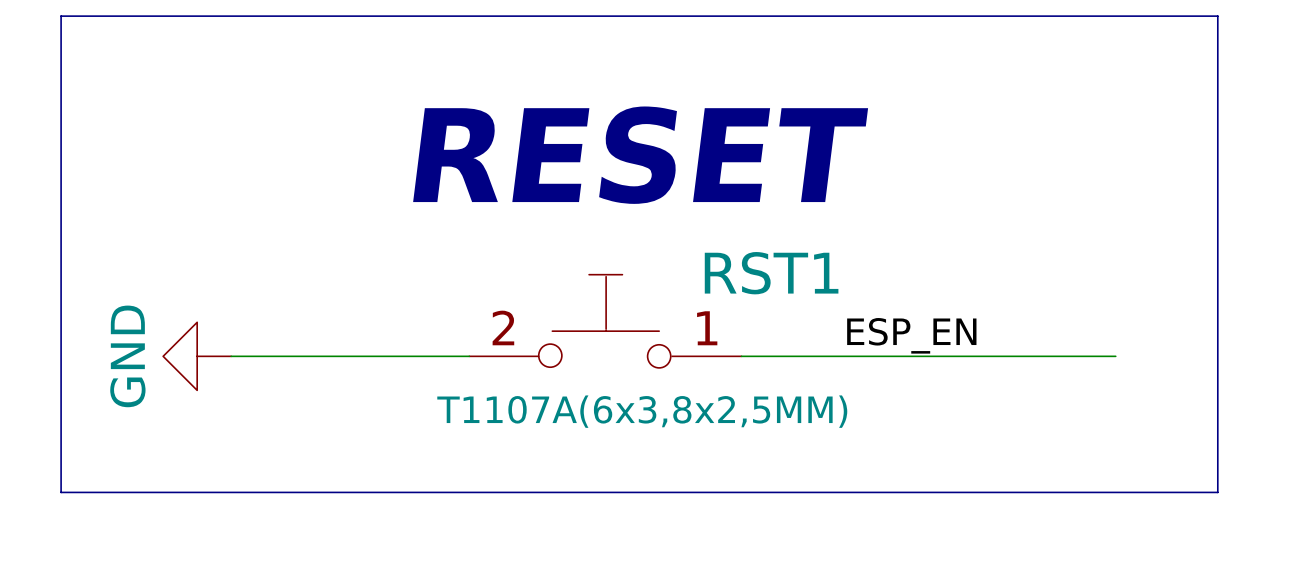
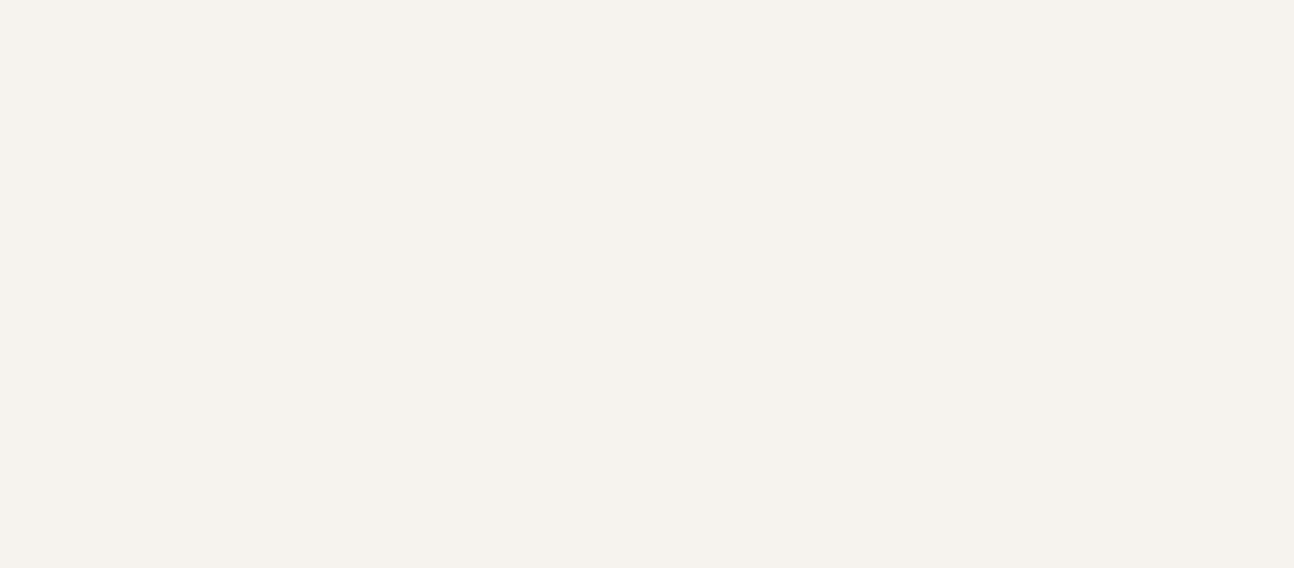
line: (61, 16) (1217, 16) (1217, 492) (61, 492) (61, 16) -> none
text: RESET (640, 155) -> none
RST1: T1107A(6x3,8x2,5MM) (605, 321) -> none
label: ESP_EN (911, 335) -> none
power symbol: GND (197, 356) -> none
wire: (231, 356) (469, 356) -> none
wire: (741, 356) (1115, 356) -> none

